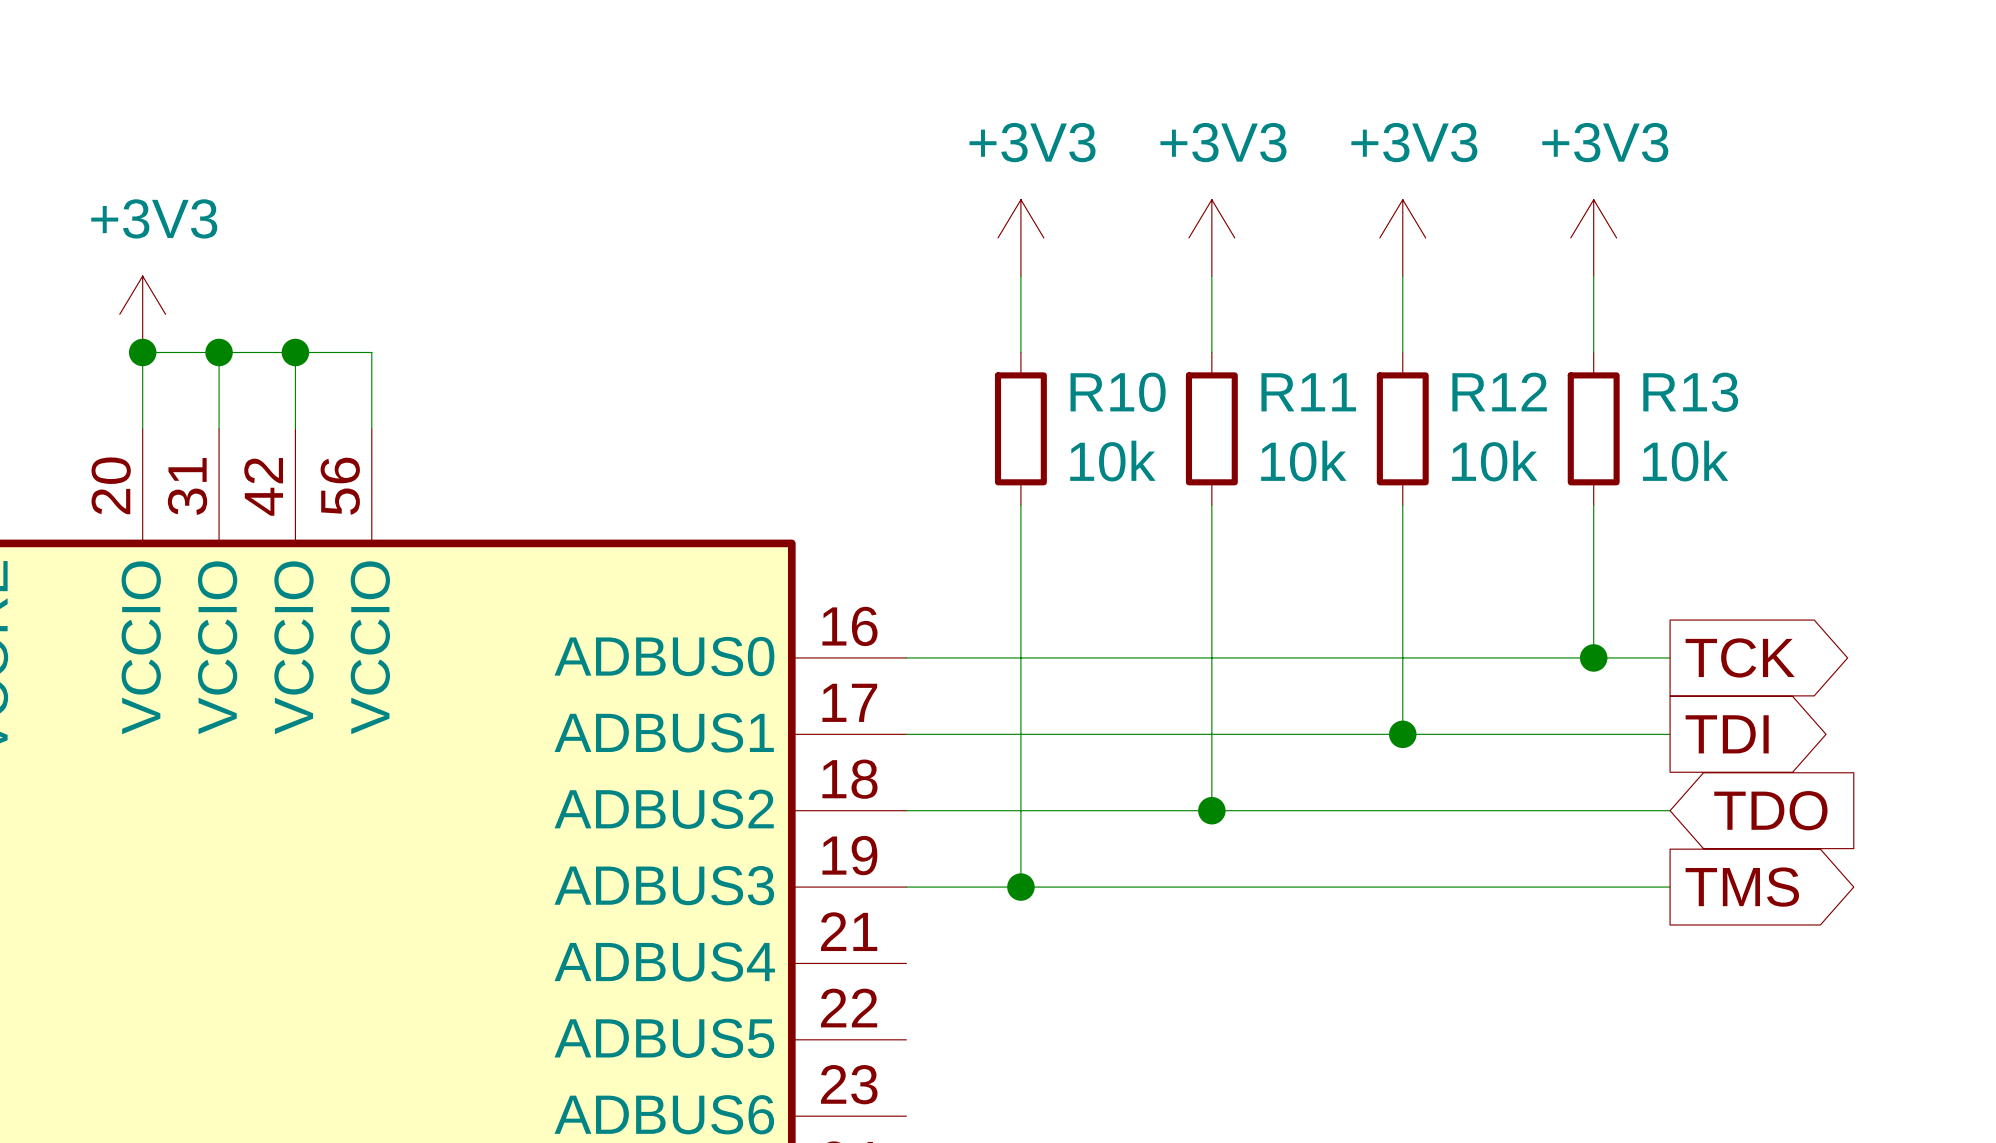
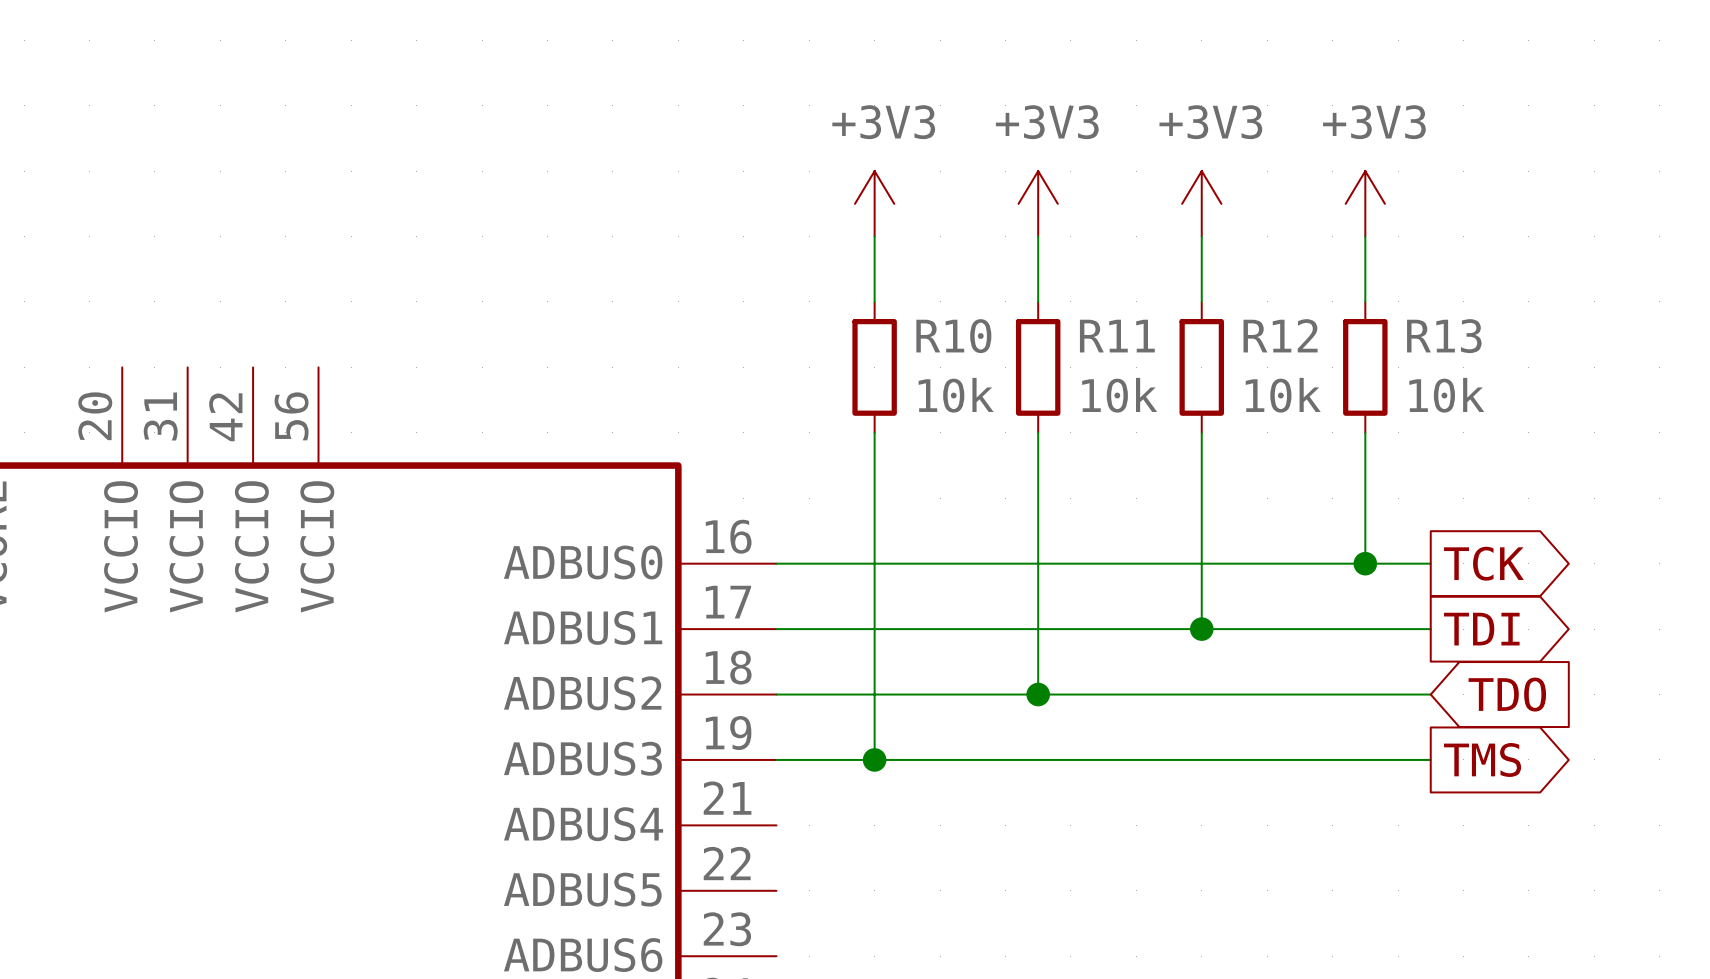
power symbol: +3V3 (142, 314) -> none
junction: (142, 352) -> none
wire: (219, 352) (219, 428) -> none
junction: (219, 352) -> none
wire: (295, 352) (295, 428) -> none
junction: (295, 352) -> none
wire: (142, 428) (142, 352) (371, 352) (371, 428) -> none

